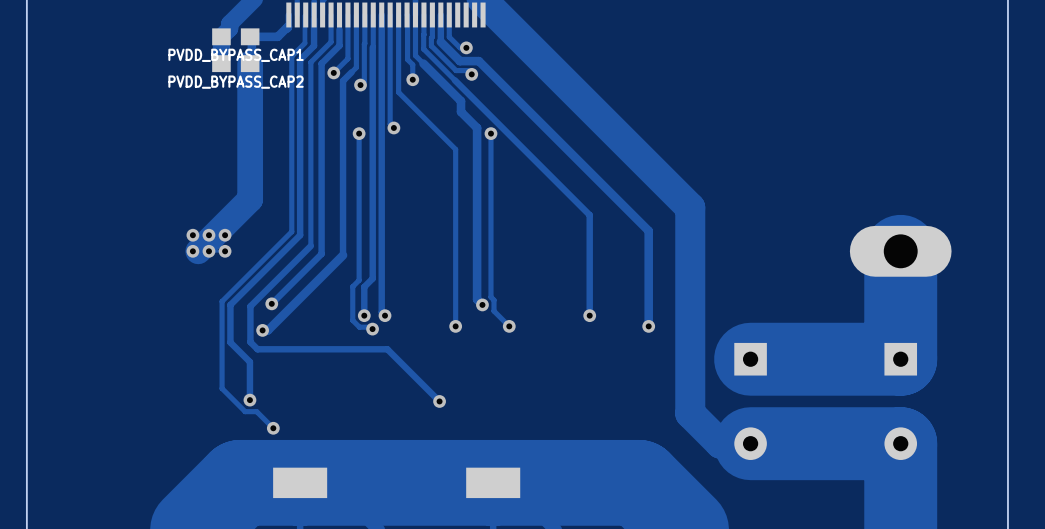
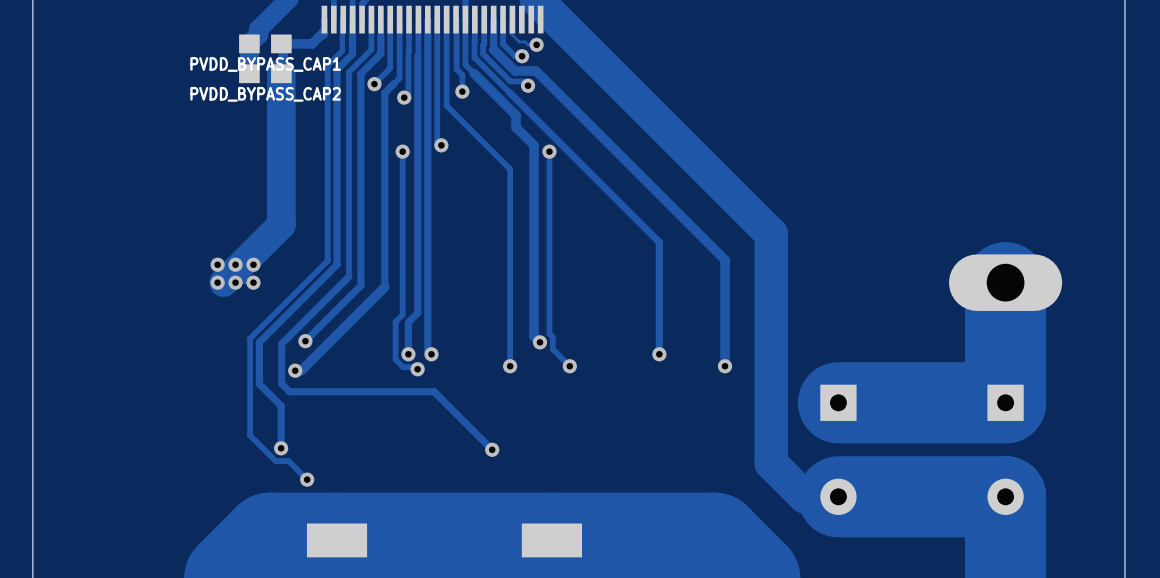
track: none -> (512, 19) (510, 33) (519, 41) (536, 44)
via: none -> (536, 44)

